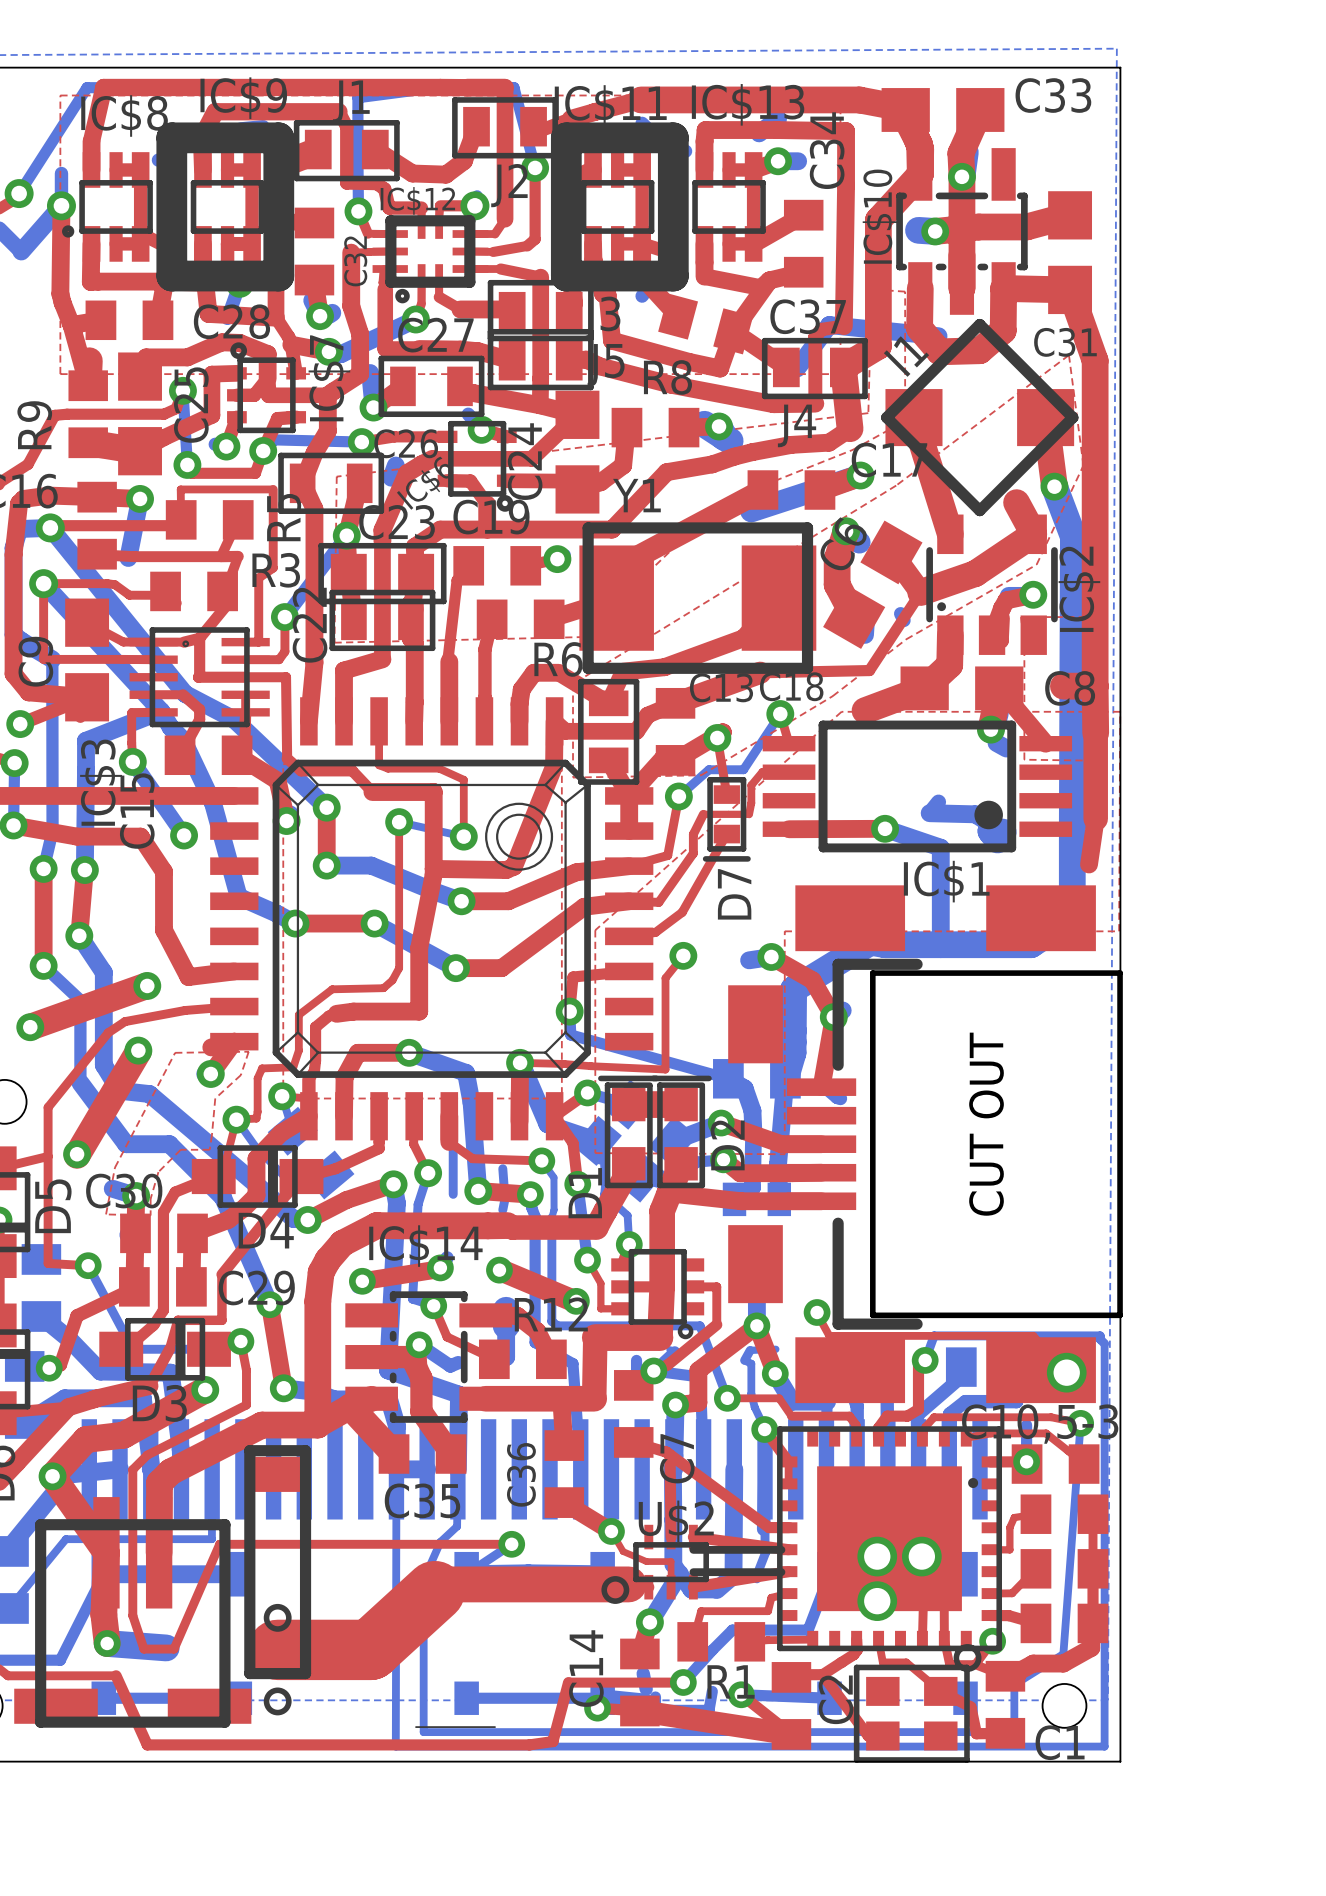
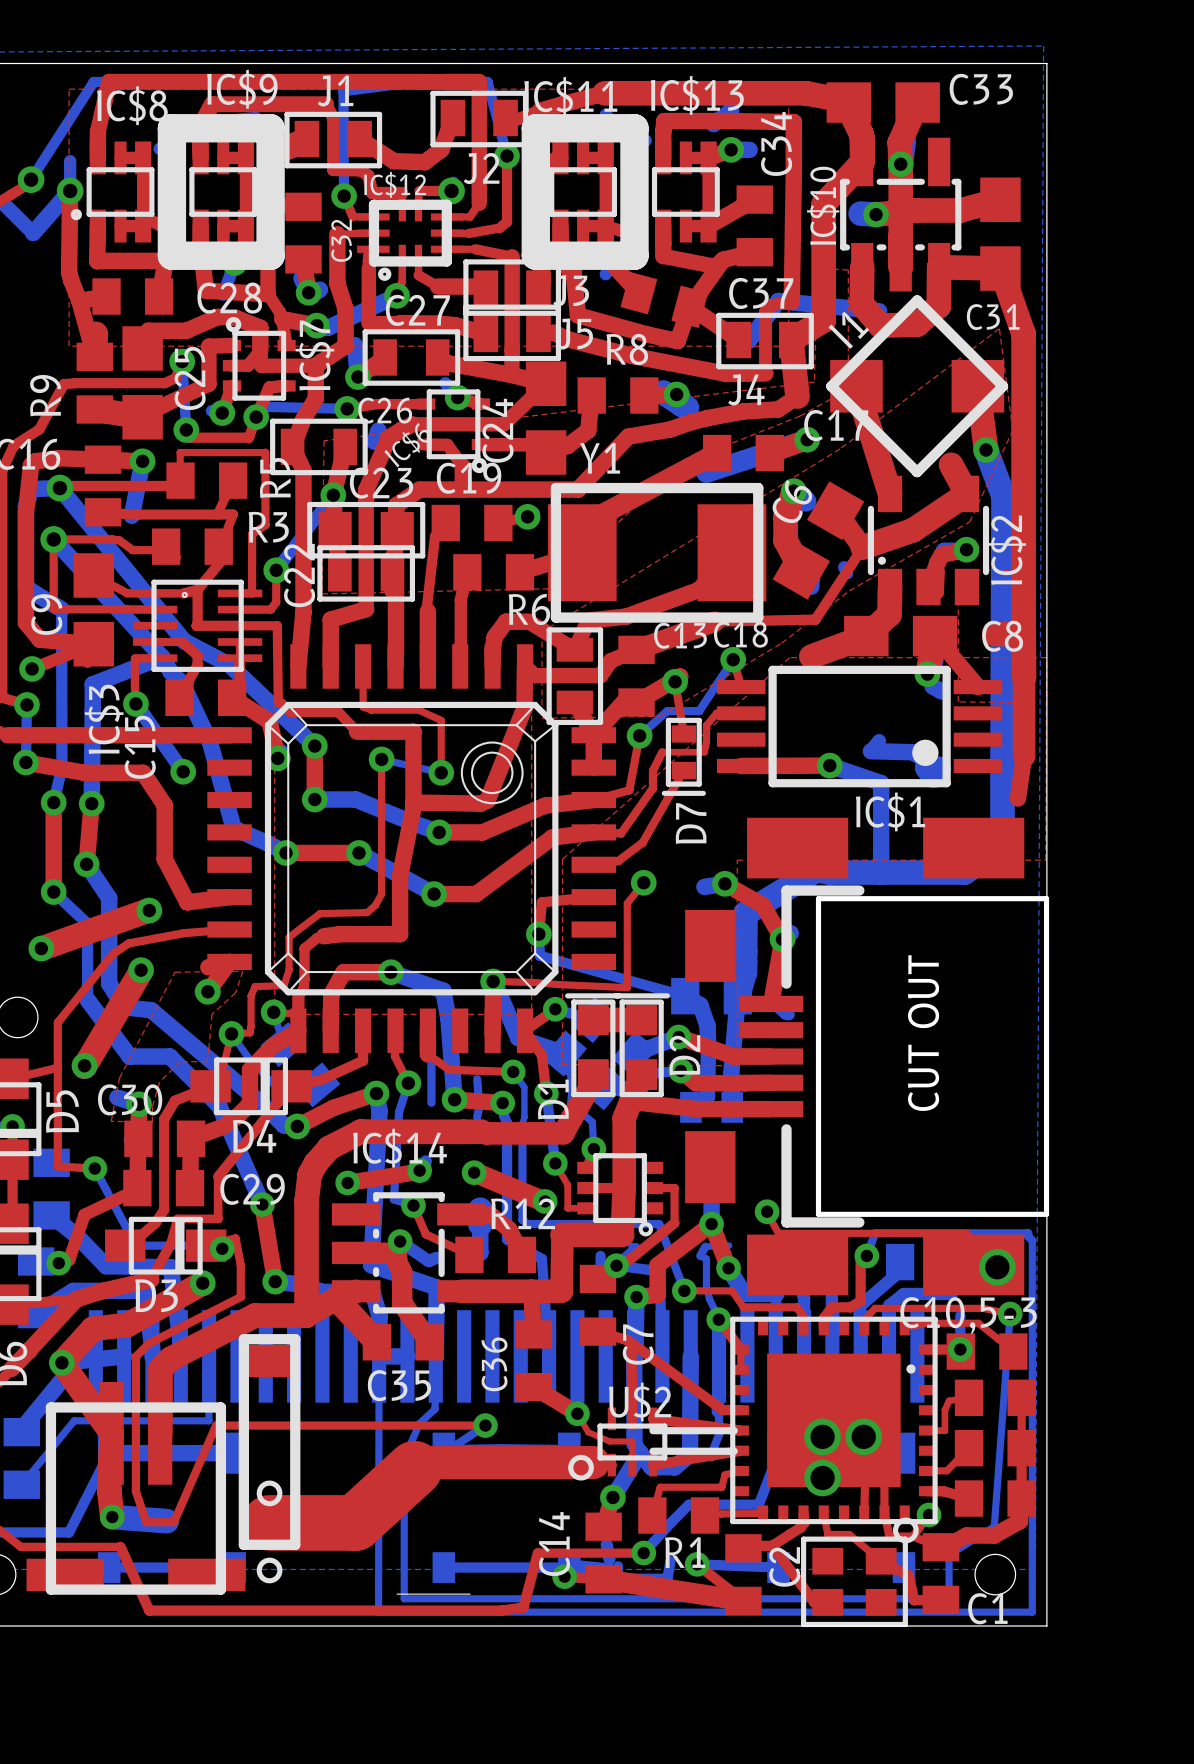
via position: (240, 1341) -> (222, 1248)

